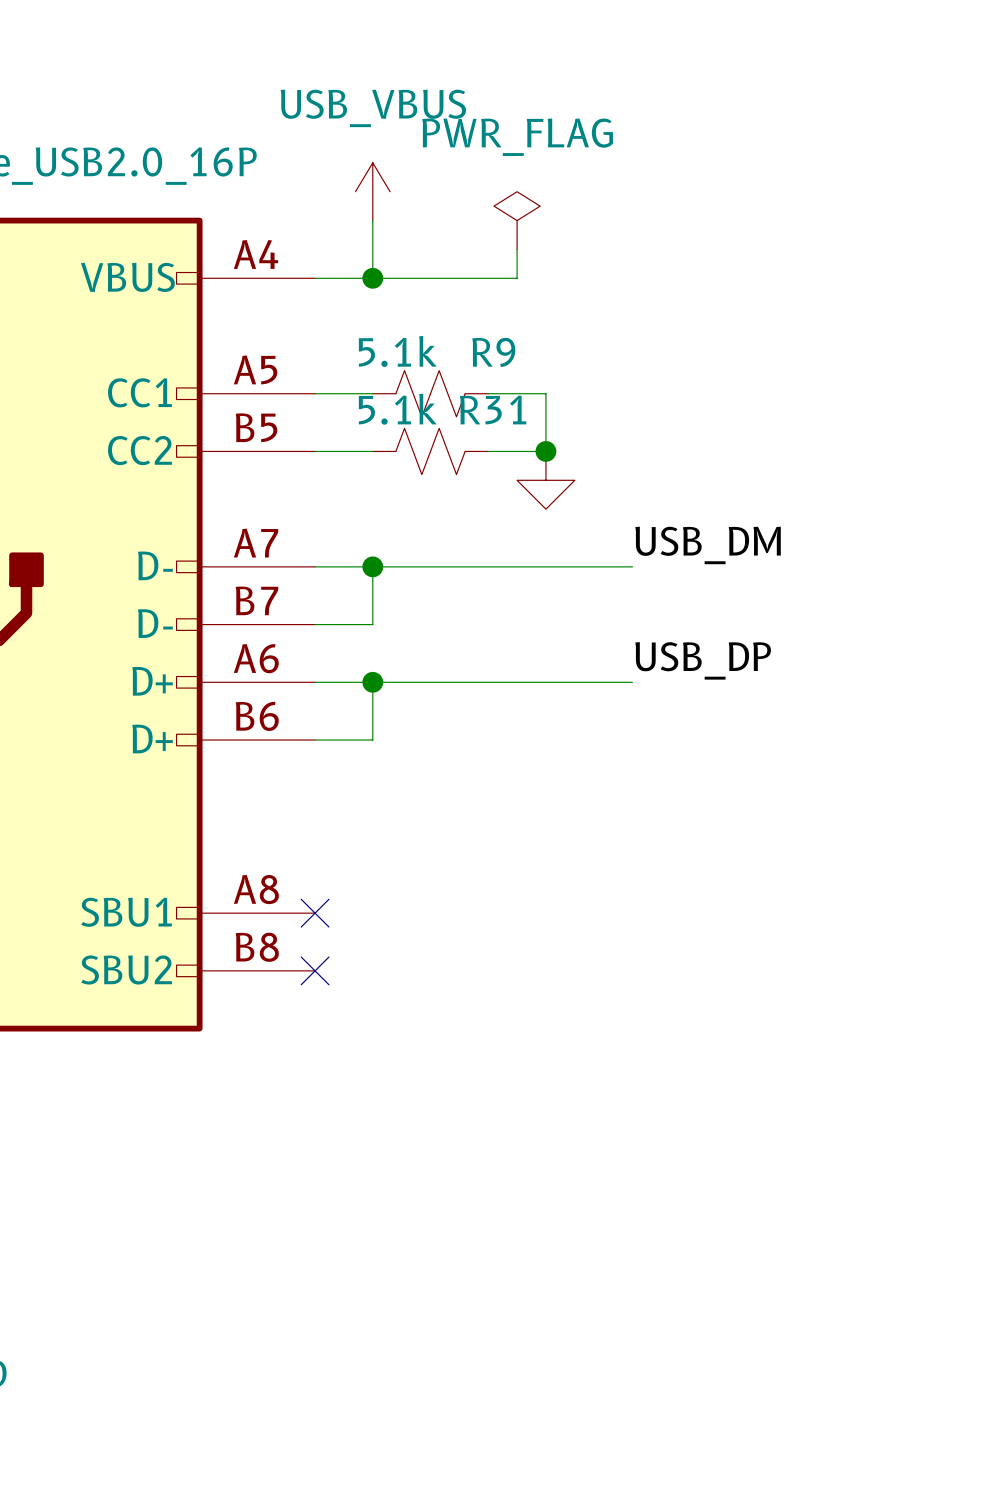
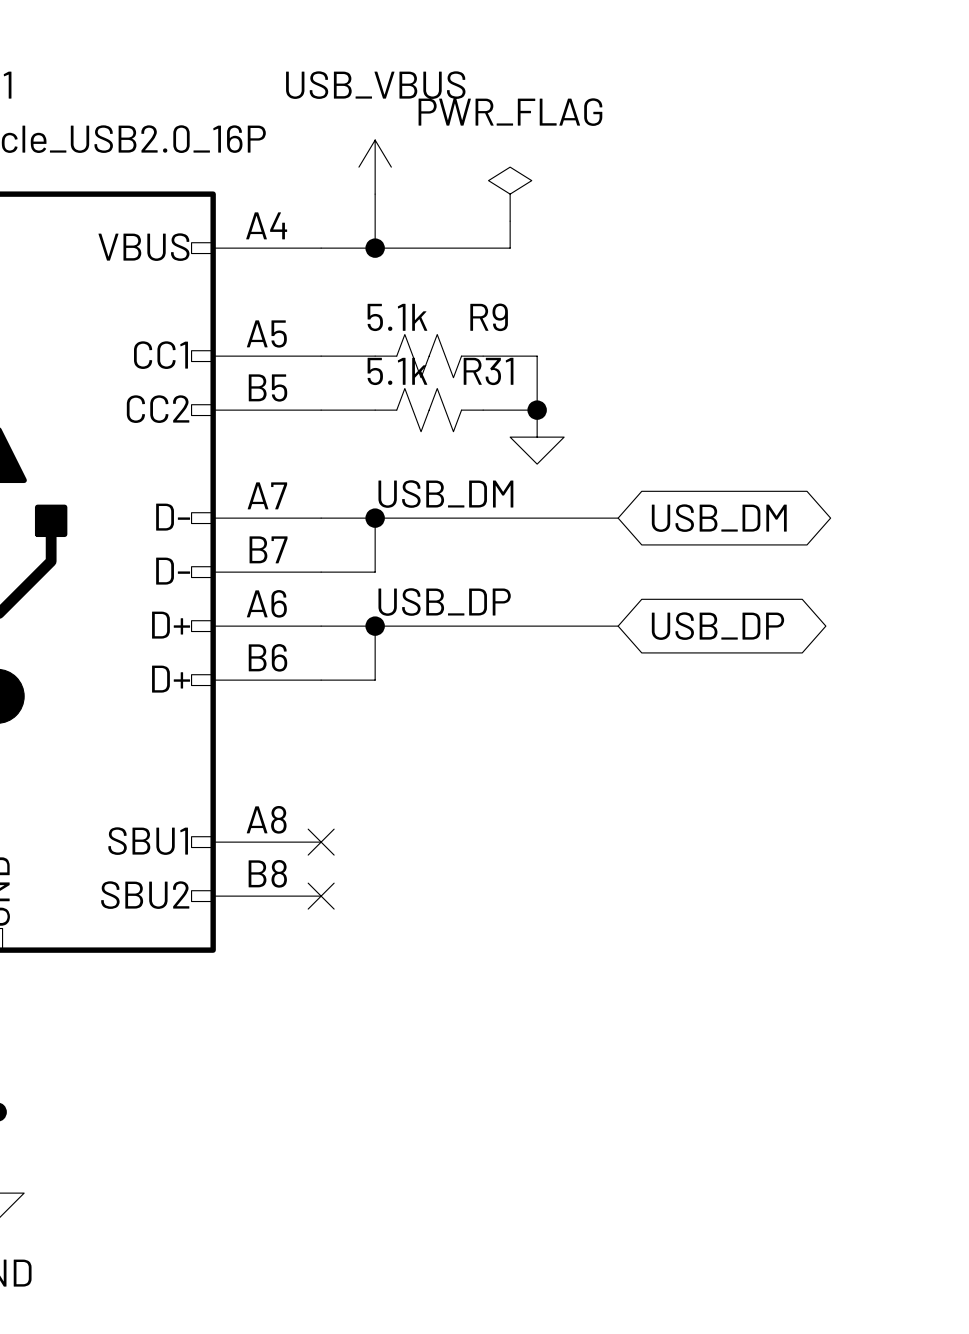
label position: USB_DM (708, 545) -> USB_DM (445, 494)
global label: none -> USB_DM (719, 518)
label position: USB_DP (703, 660) -> USB_DP (444, 602)
global label: none -> USB_DP (717, 626)

